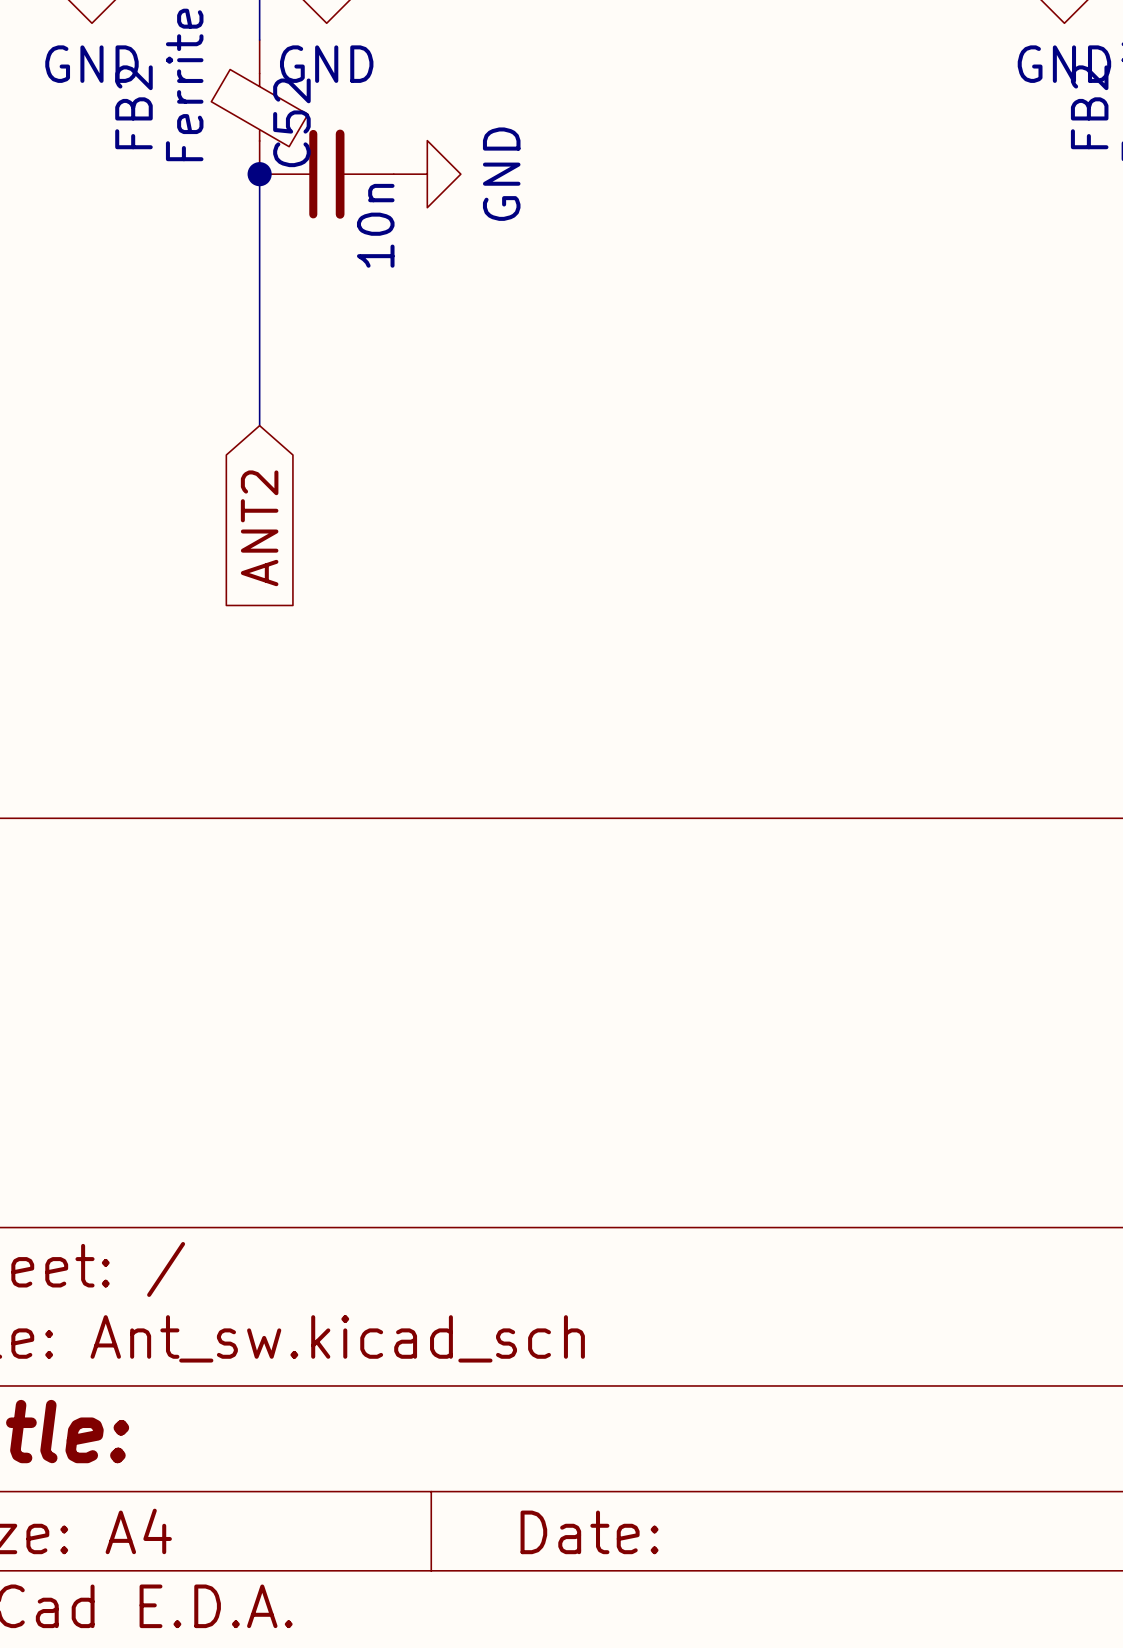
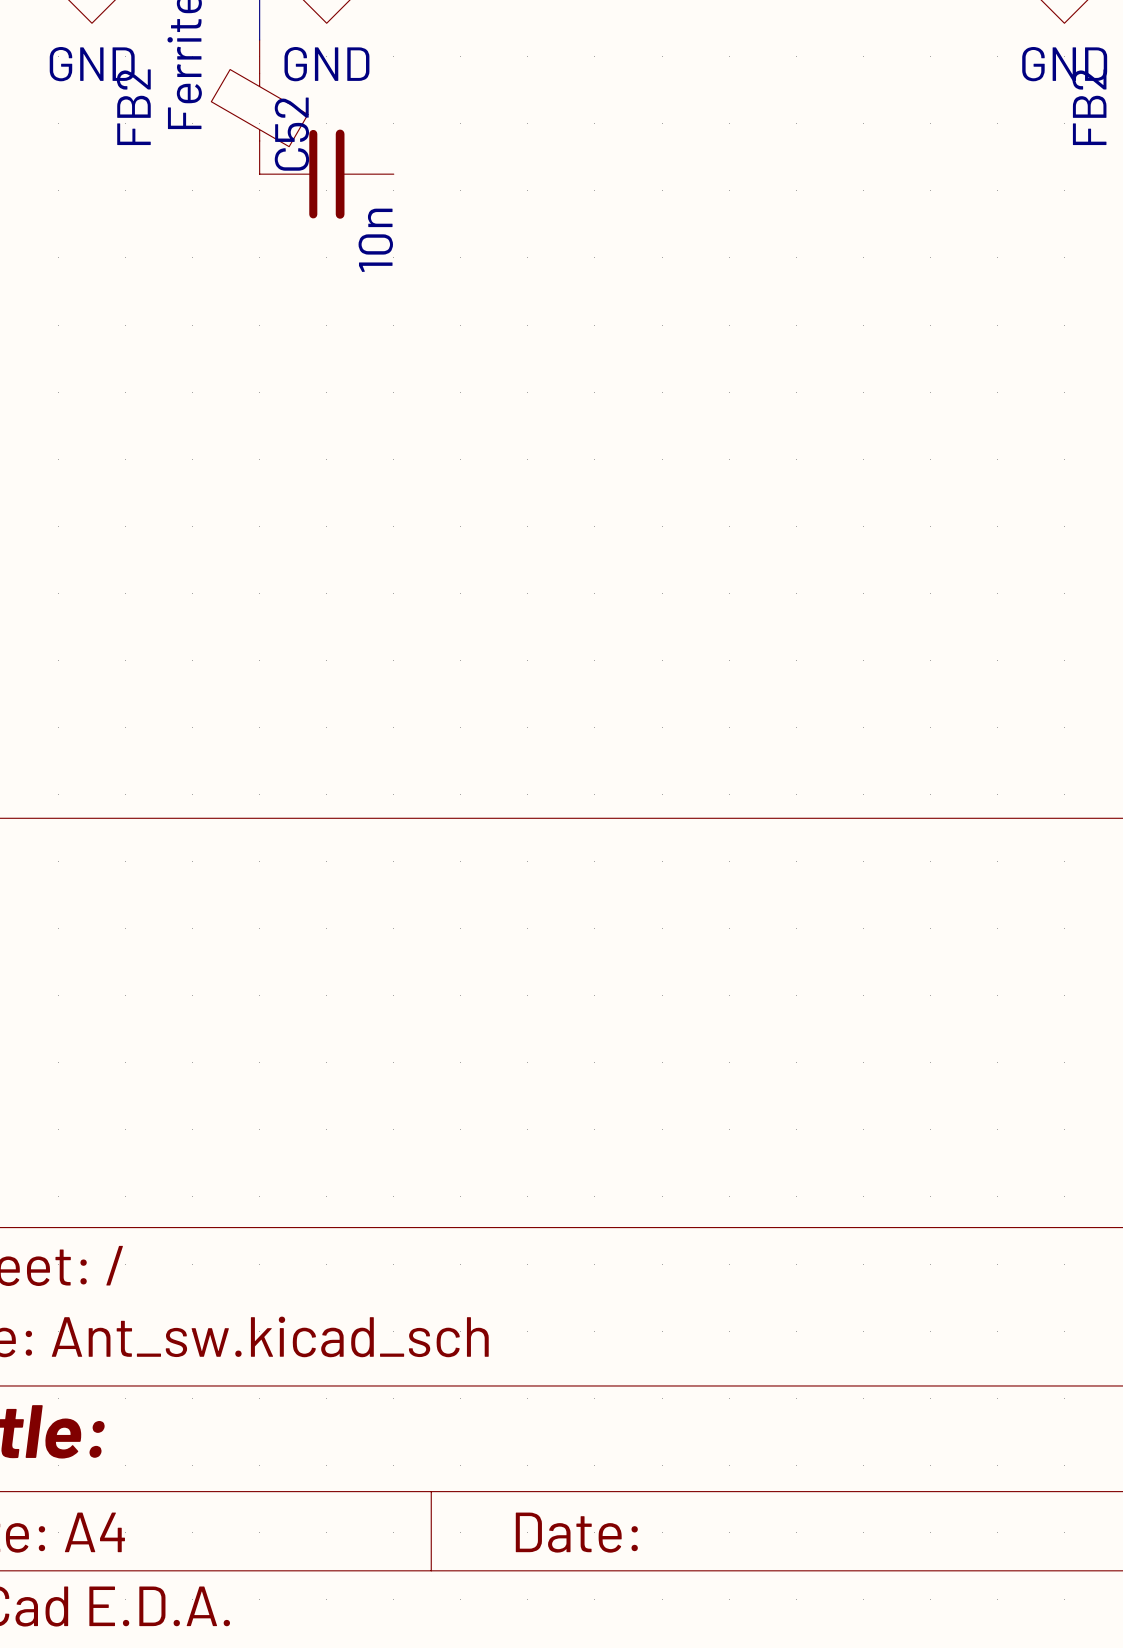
wire: (259, 174) (259, 425) -> none
junction: (259, 174) -> none
power symbol: GND (427, 174) -> none
global label: ANT2 (259, 528) -> none

